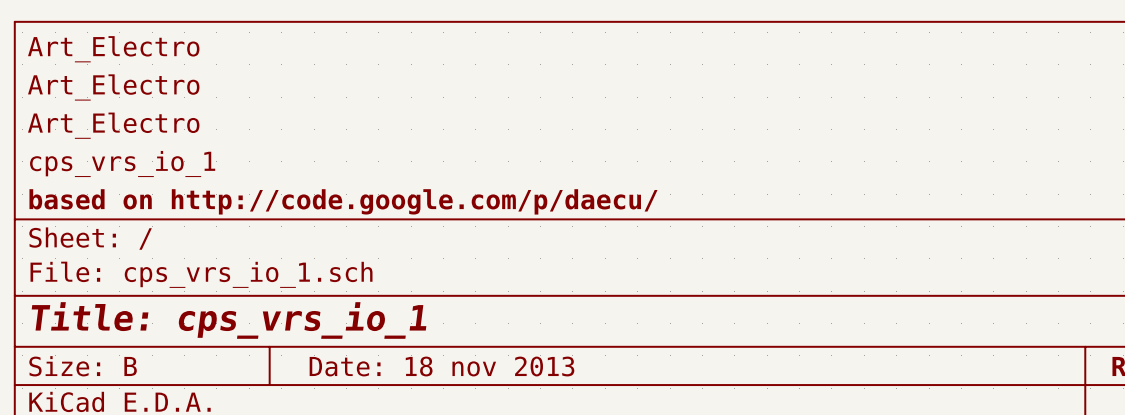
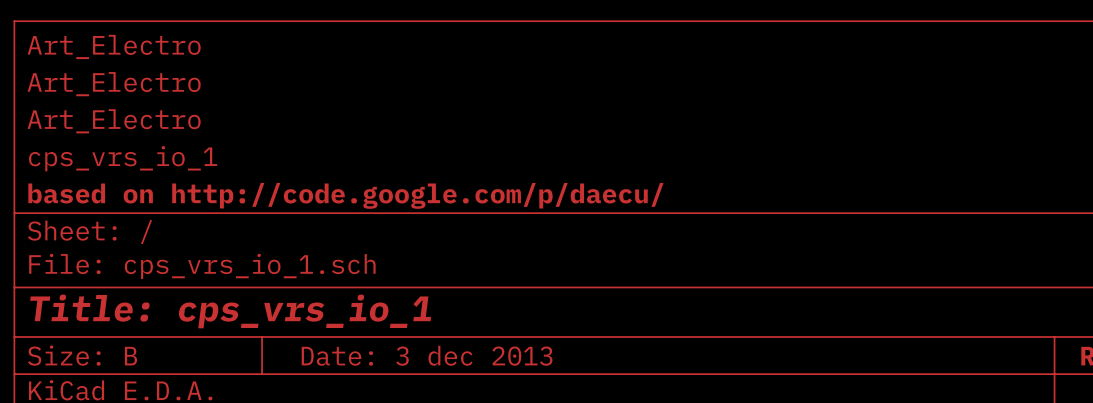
title block: Date: 18 nov 2013 (441, 366) -> Date: 3 dec 2013 (427, 355)

